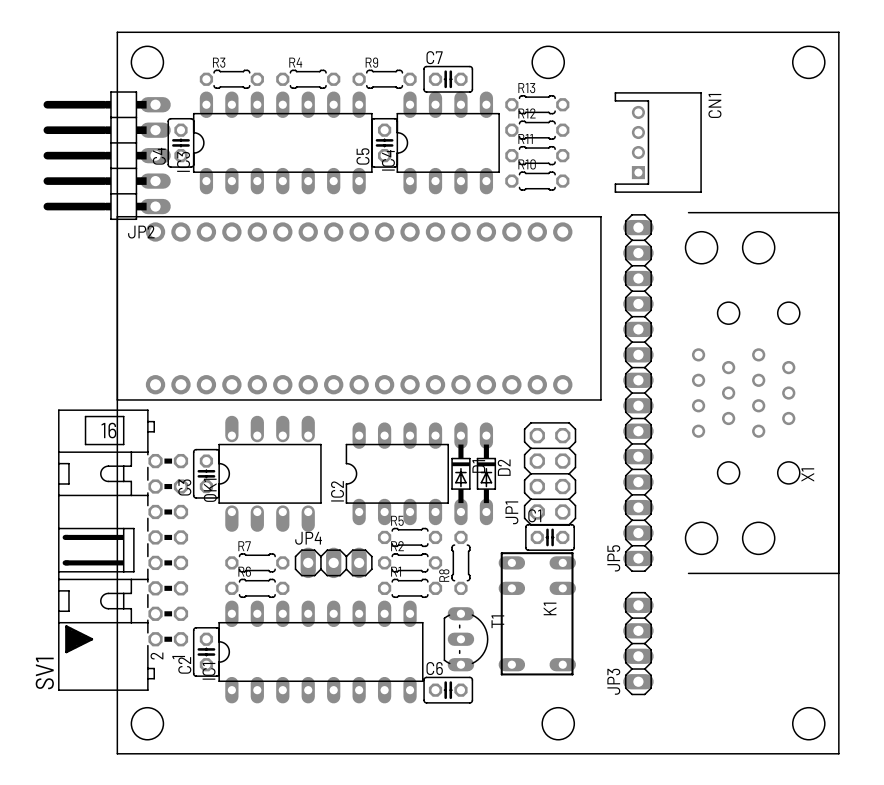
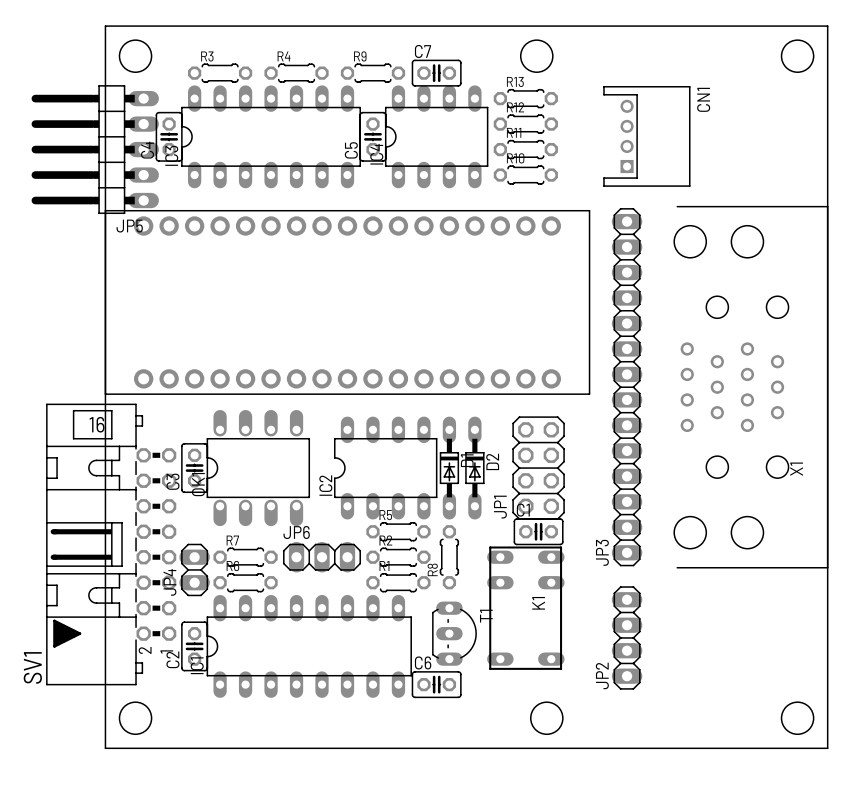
JP2 name: JP2 (141, 232) -> JP5 (129, 226)
JP4 name: JP4 (308, 538) -> JP6 (296, 532)
JP5 name: JP5 (613, 558) -> JP3 (602, 552)
JP4: none -> (194, 569)
JP3 name: JP3 (613, 681) -> JP2 (602, 675)

